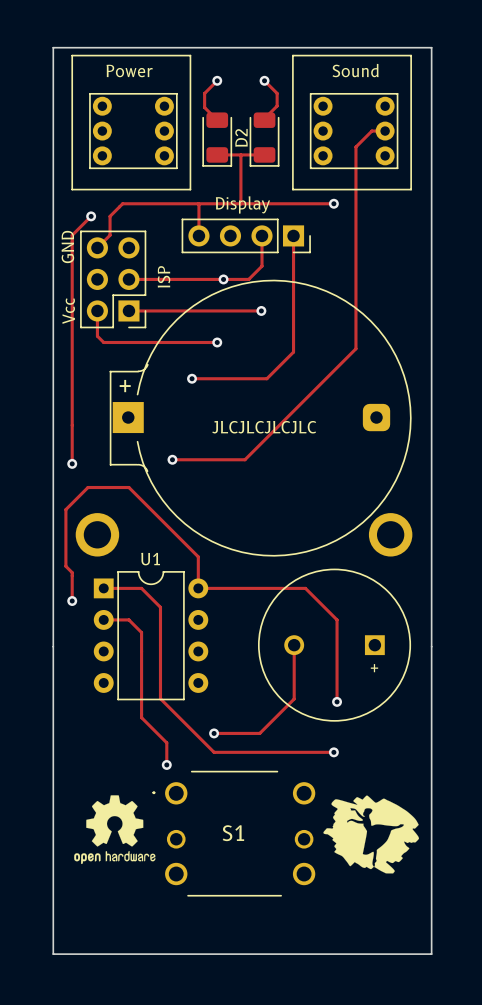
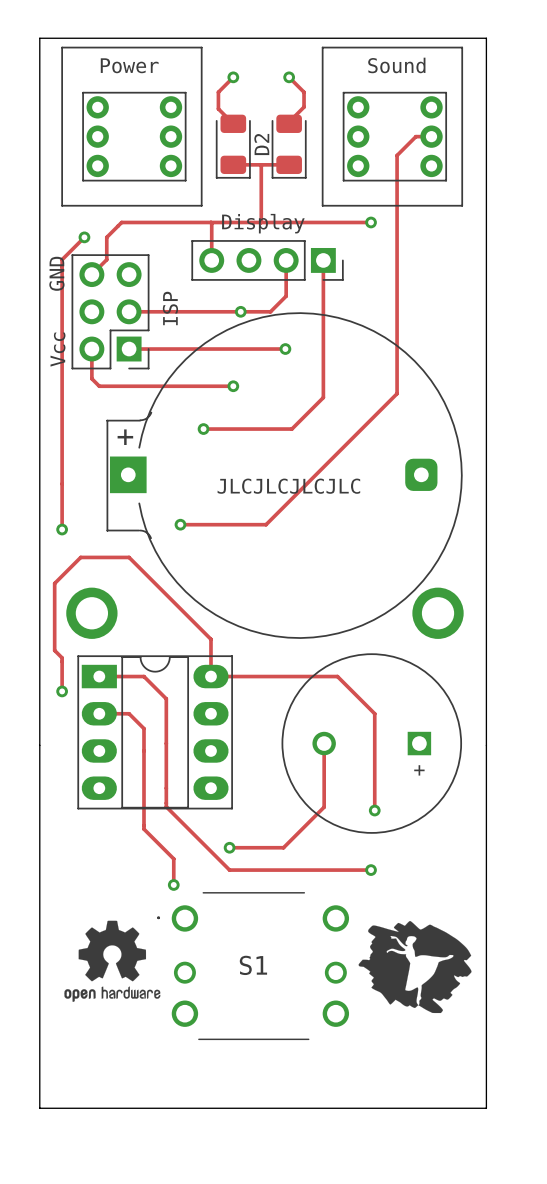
U1: (151, 635) -> none
part: none -> (155, 732)

